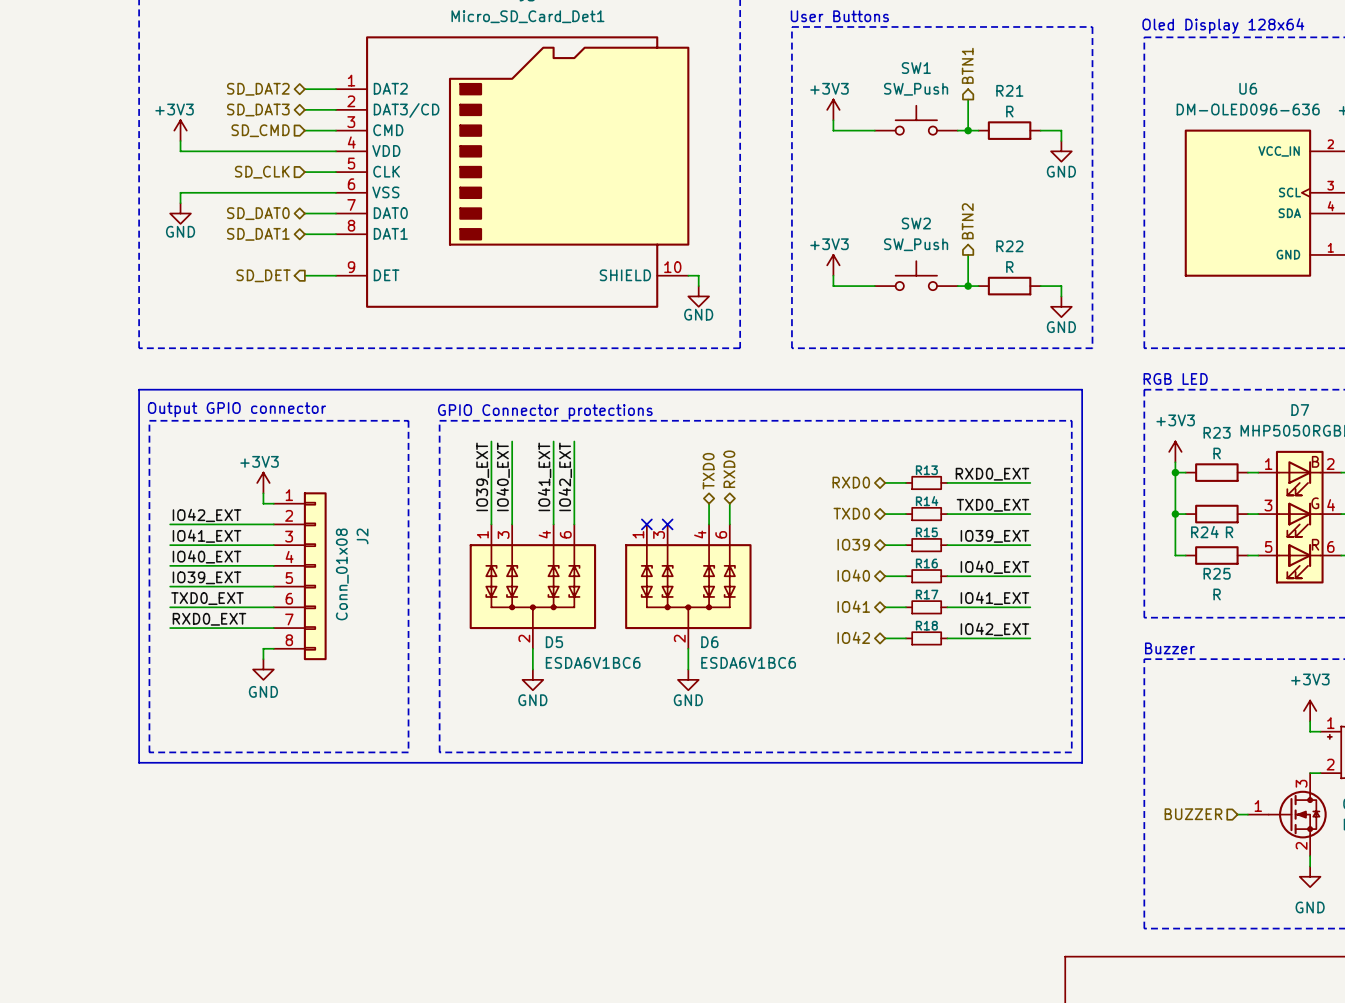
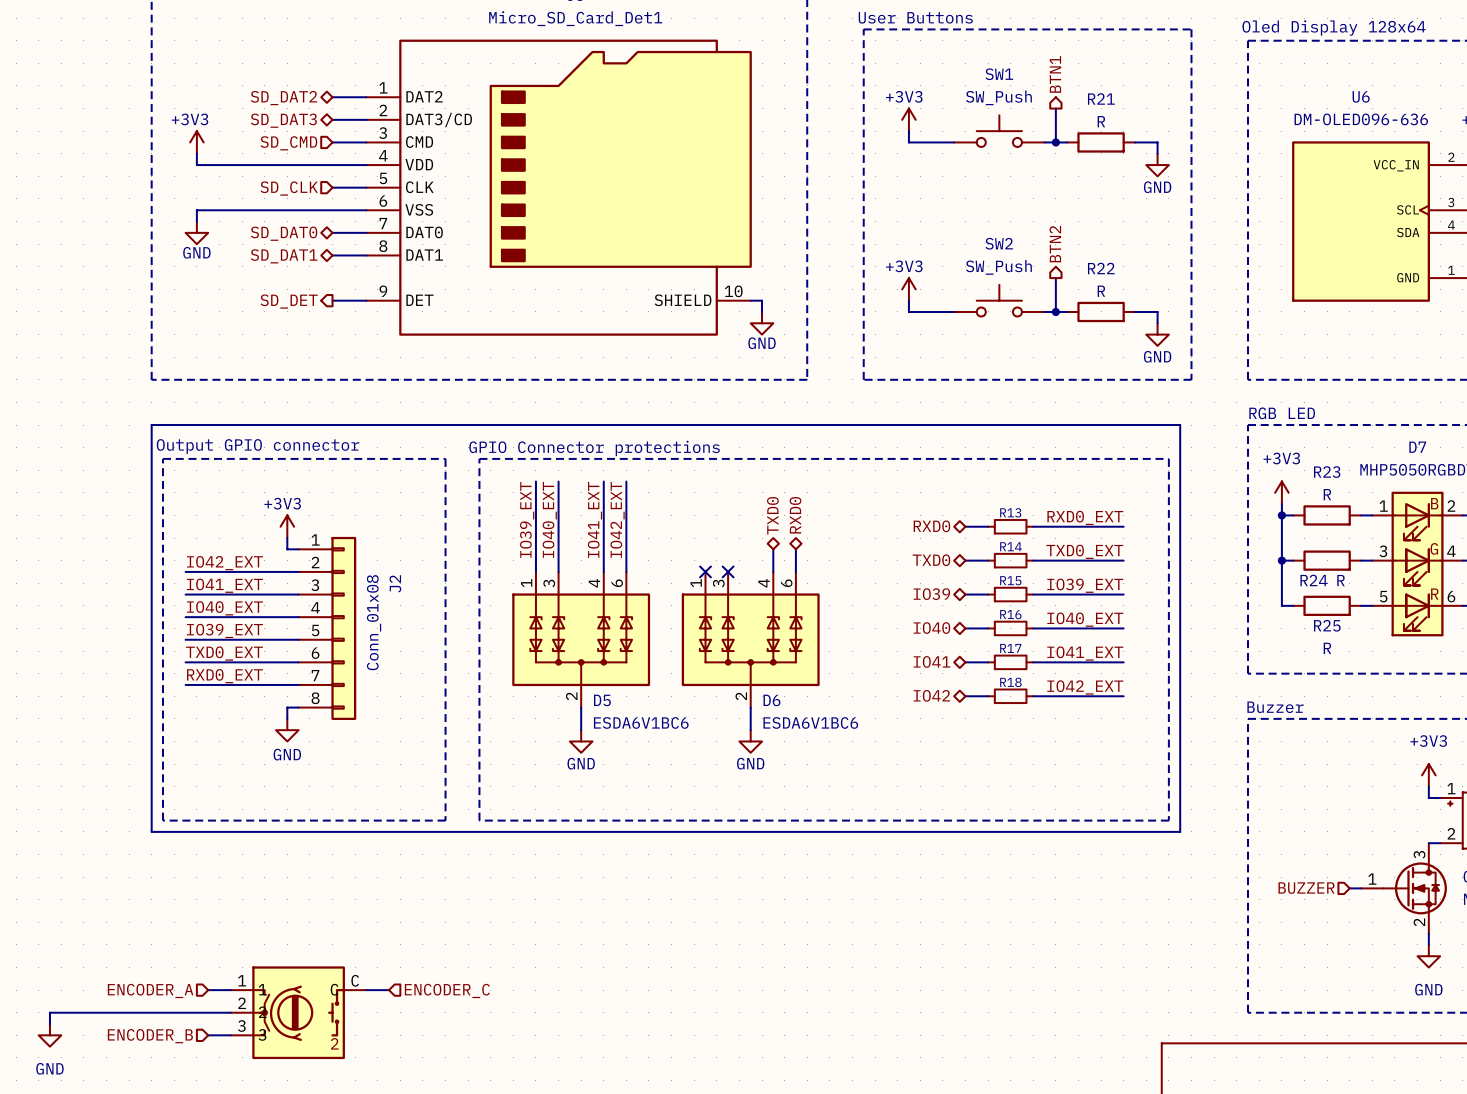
hierarchical label: none -> ENCODER_A (150, 990)
wire: none -> (208, 990) (230, 990)
wire: none -> (366, 990) (389, 990)
hierarchical label: none -> ENCODER_C (447, 990)
wire: none -> (230, 1012) (49, 1012) (49, 1024)
part: none -> (298, 1012)
power symbol: none -> GND (49, 1035)
hierarchical label: none -> ENCODER_B (150, 1036)
wire: none -> (208, 1035) (230, 1035)

